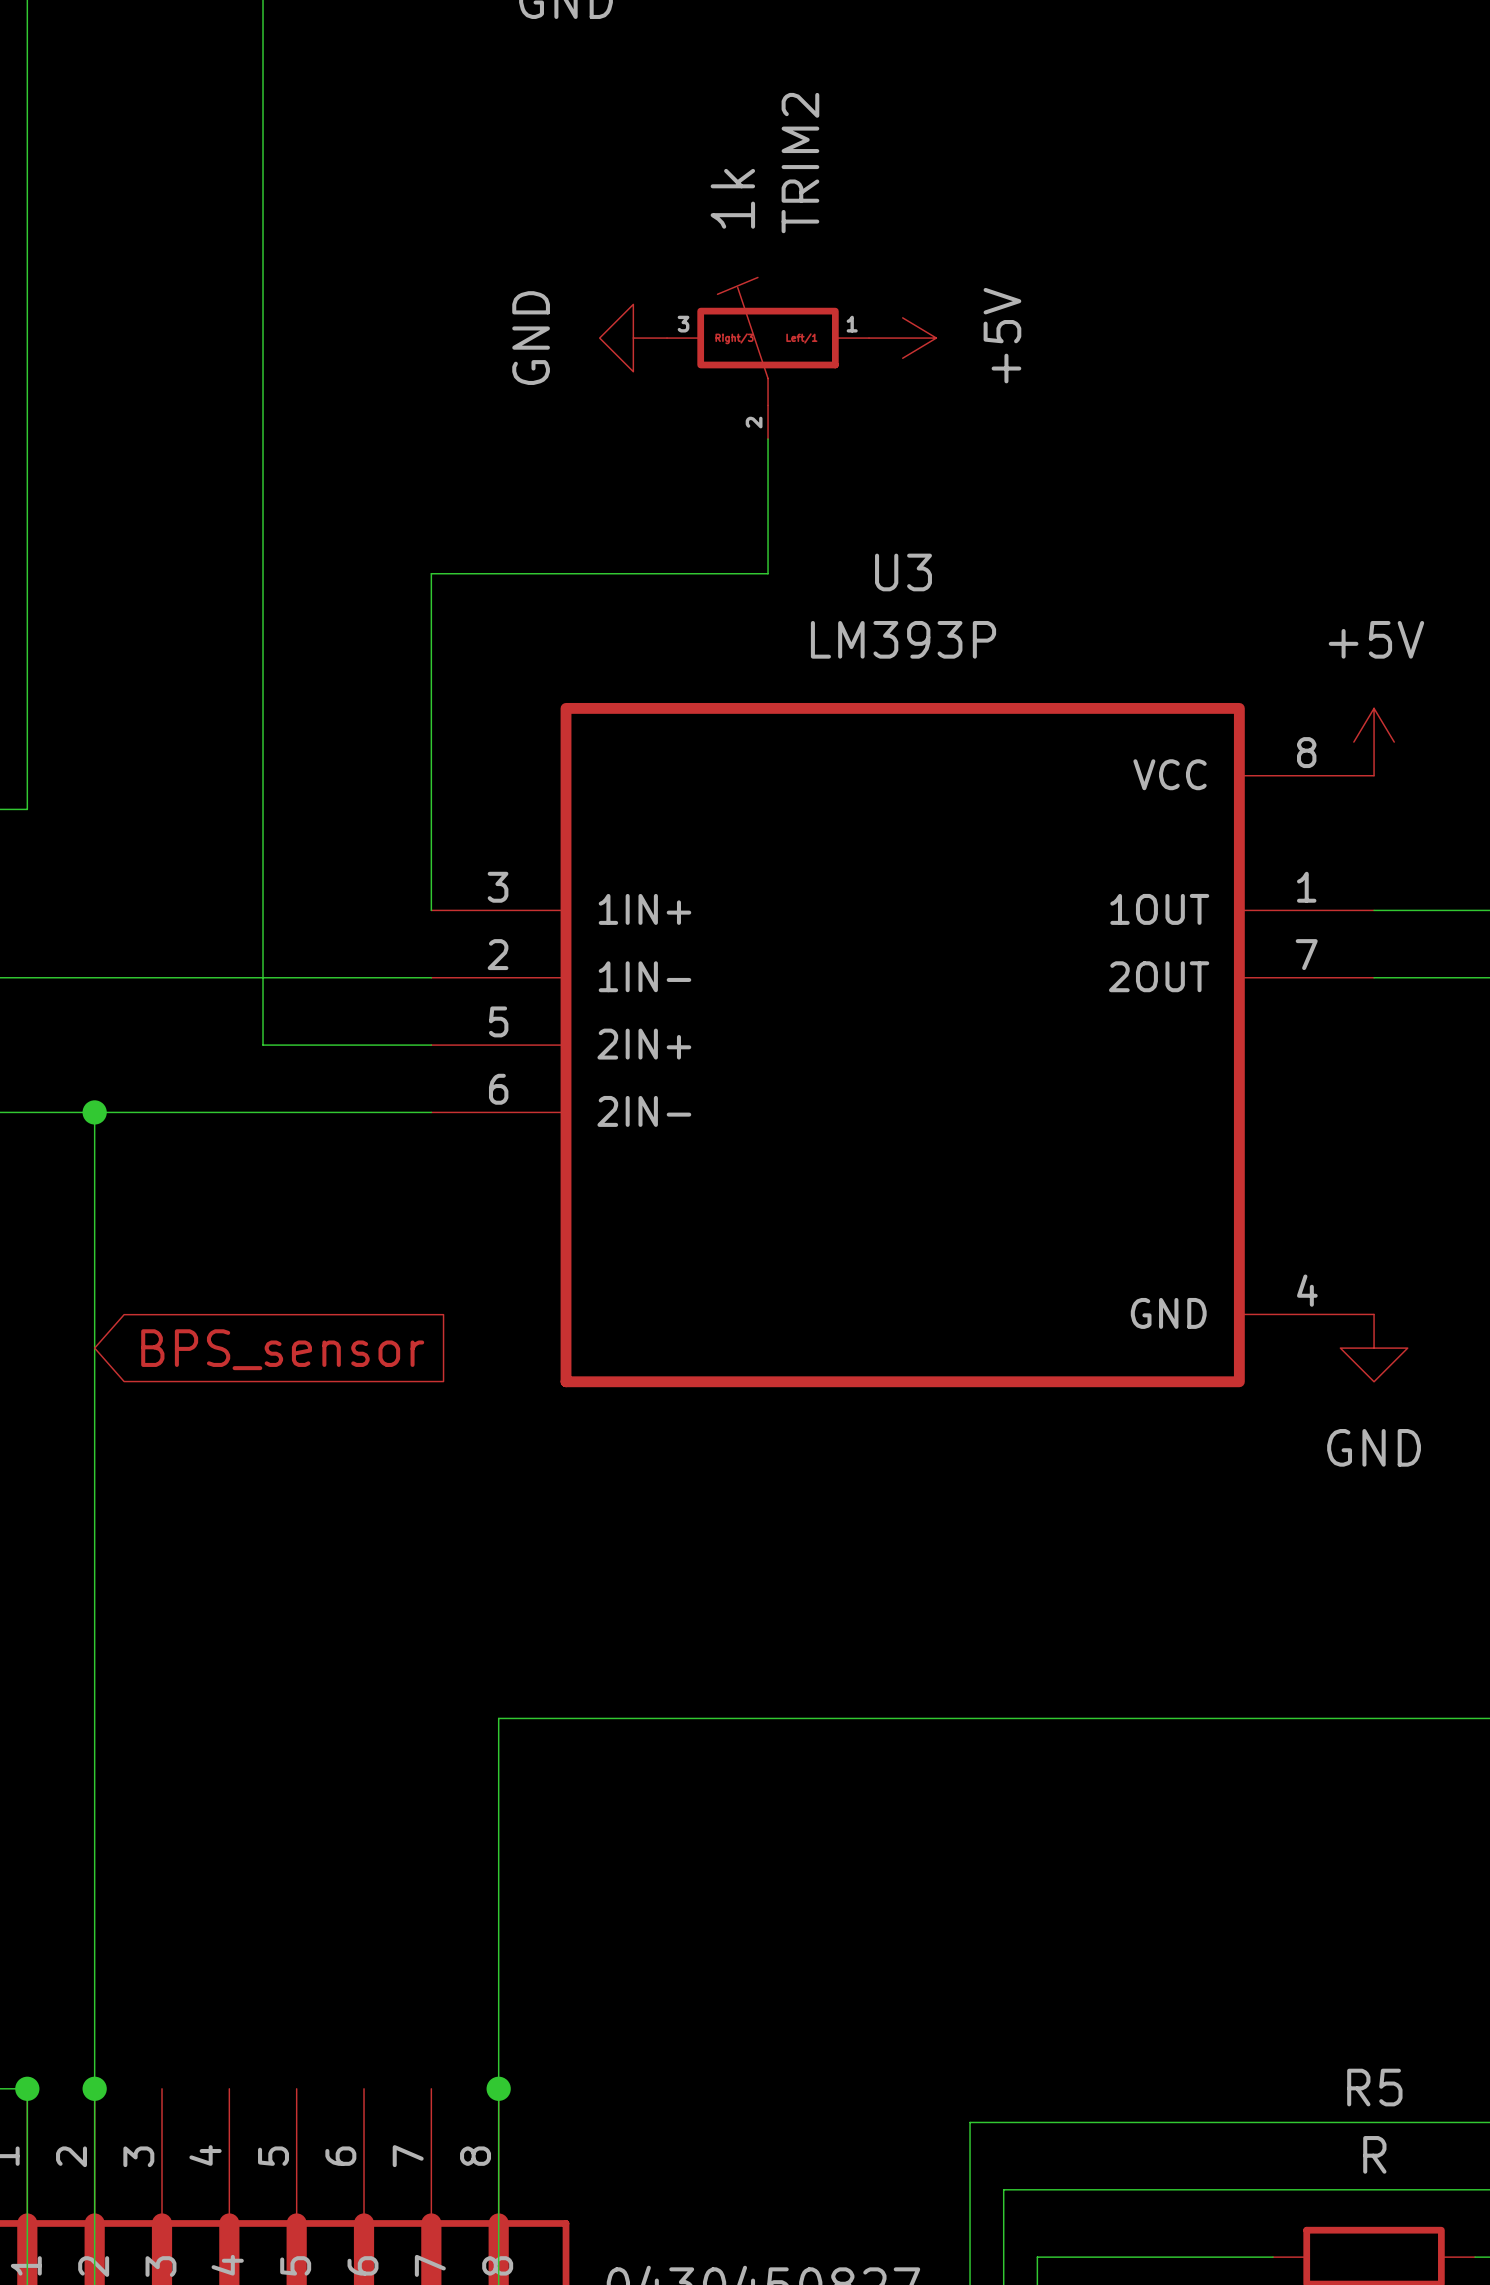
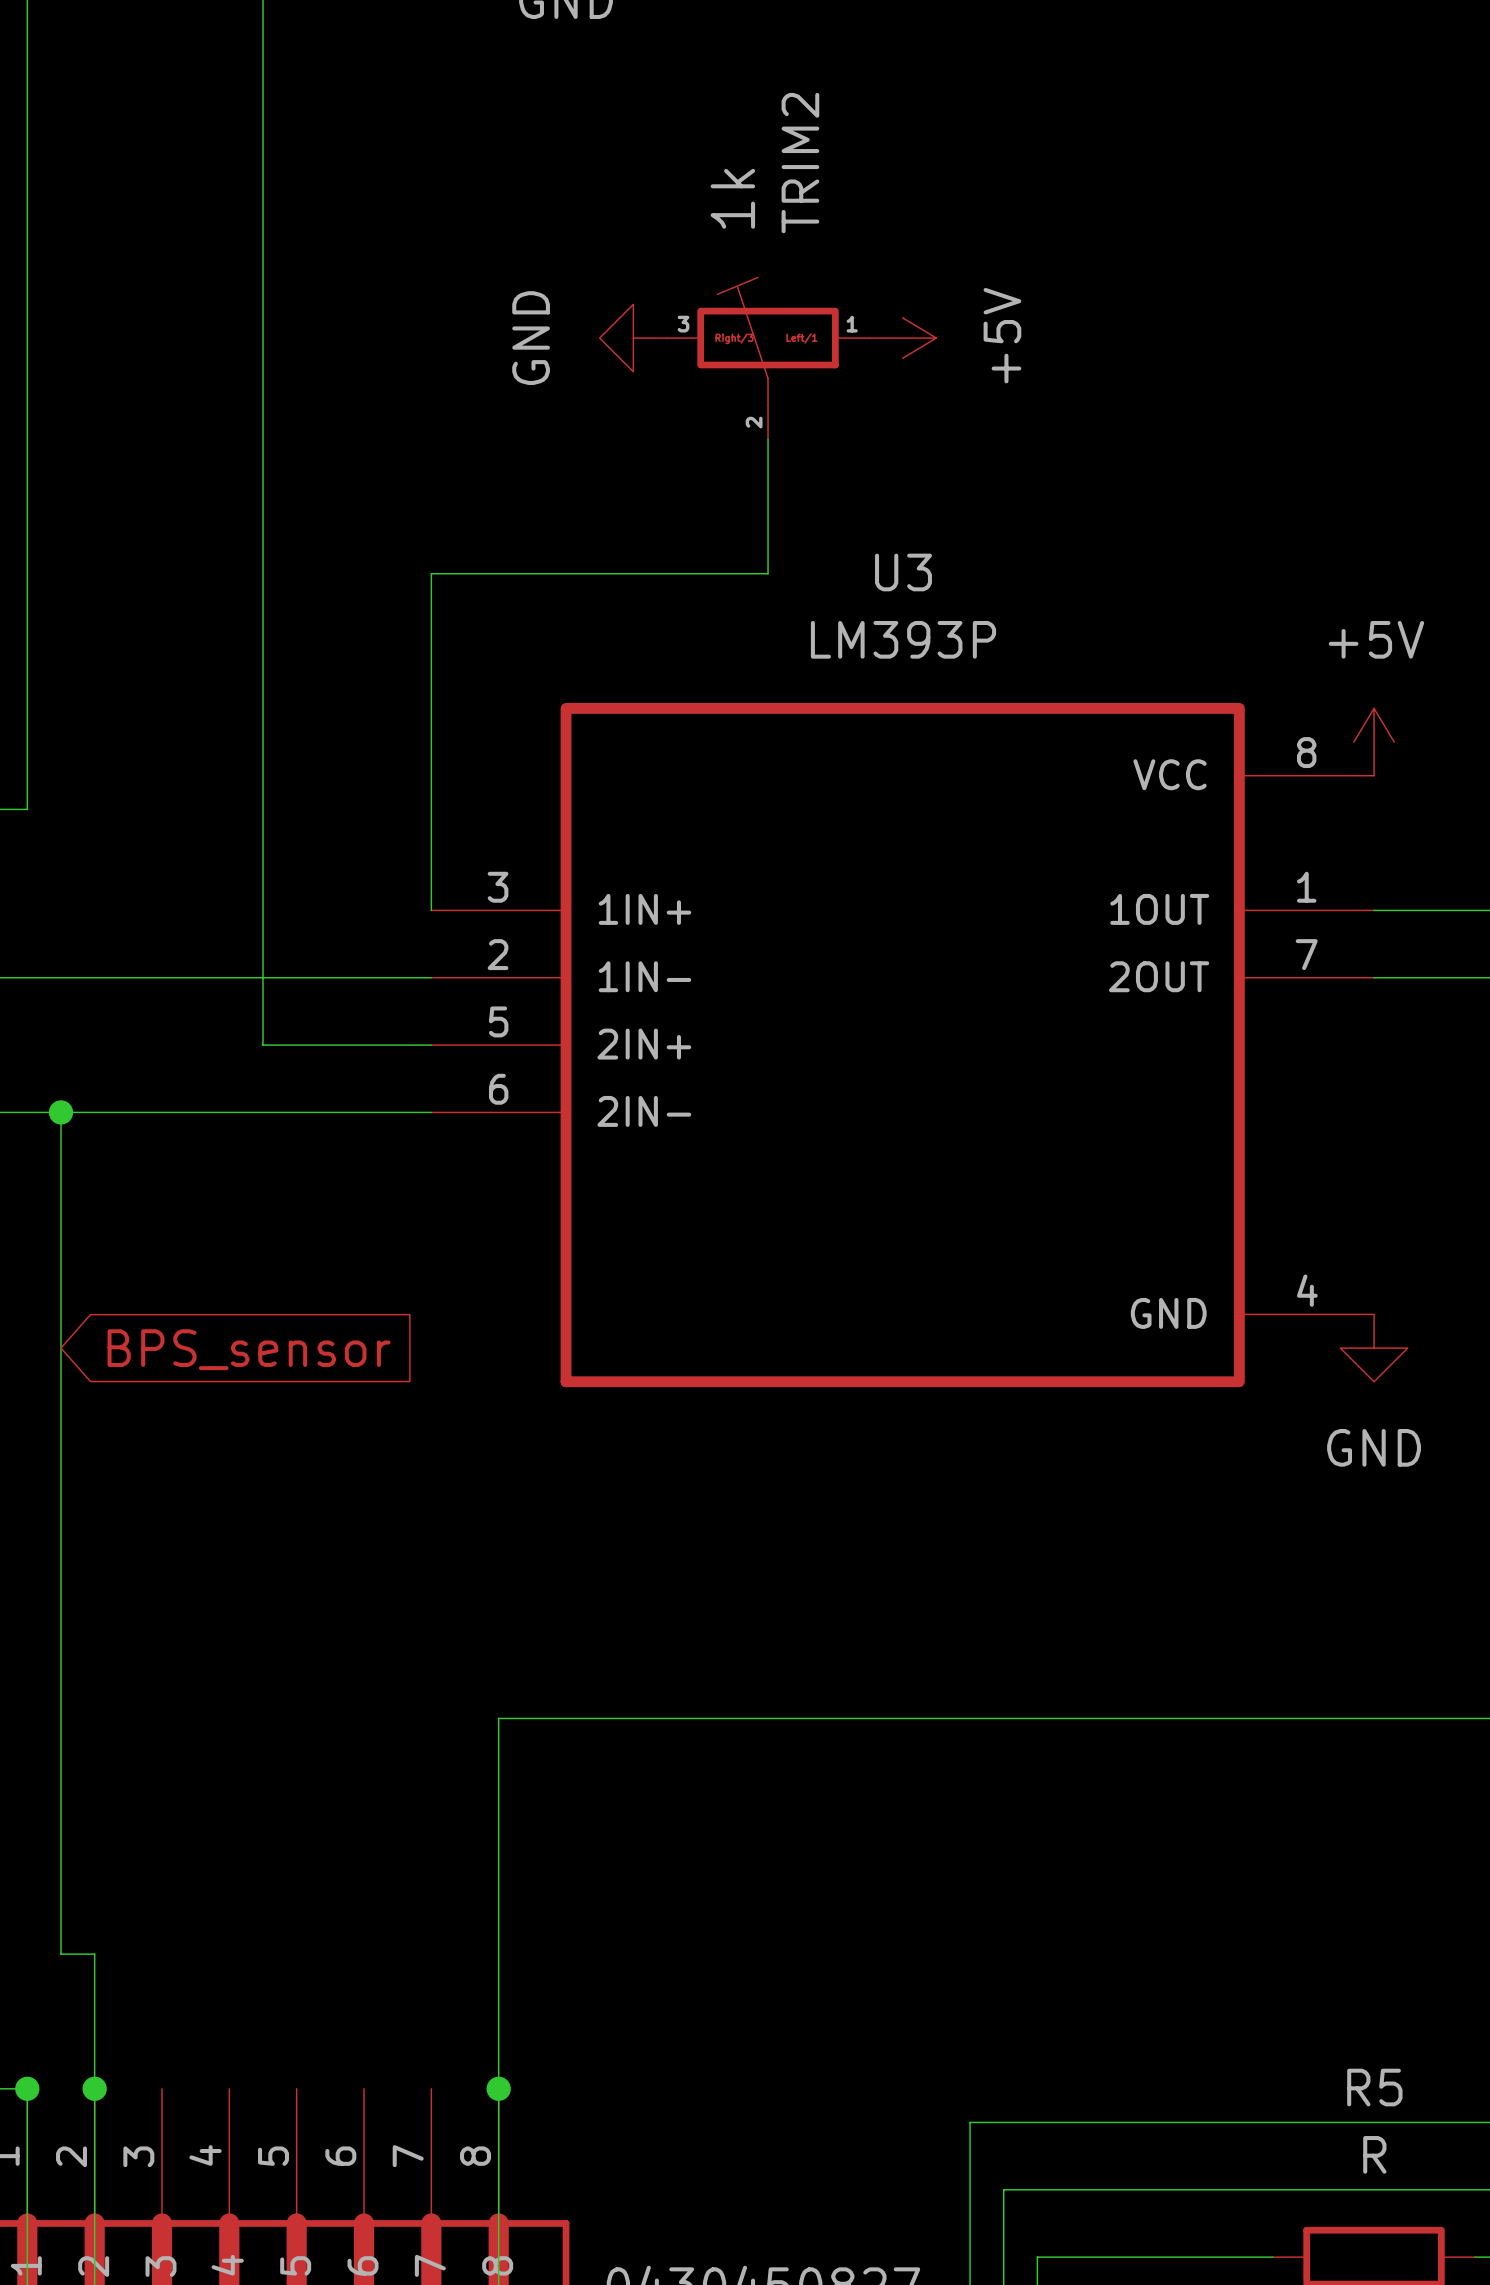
wire: (94, 1112) (94, 1954) -> (60, 1112) (60, 1954) (94, 1954)
junction position: (94, 1112) -> (60, 1112)
global label position: BPS_sensor (282, 1349) -> BPS_sensor (249, 1349)

